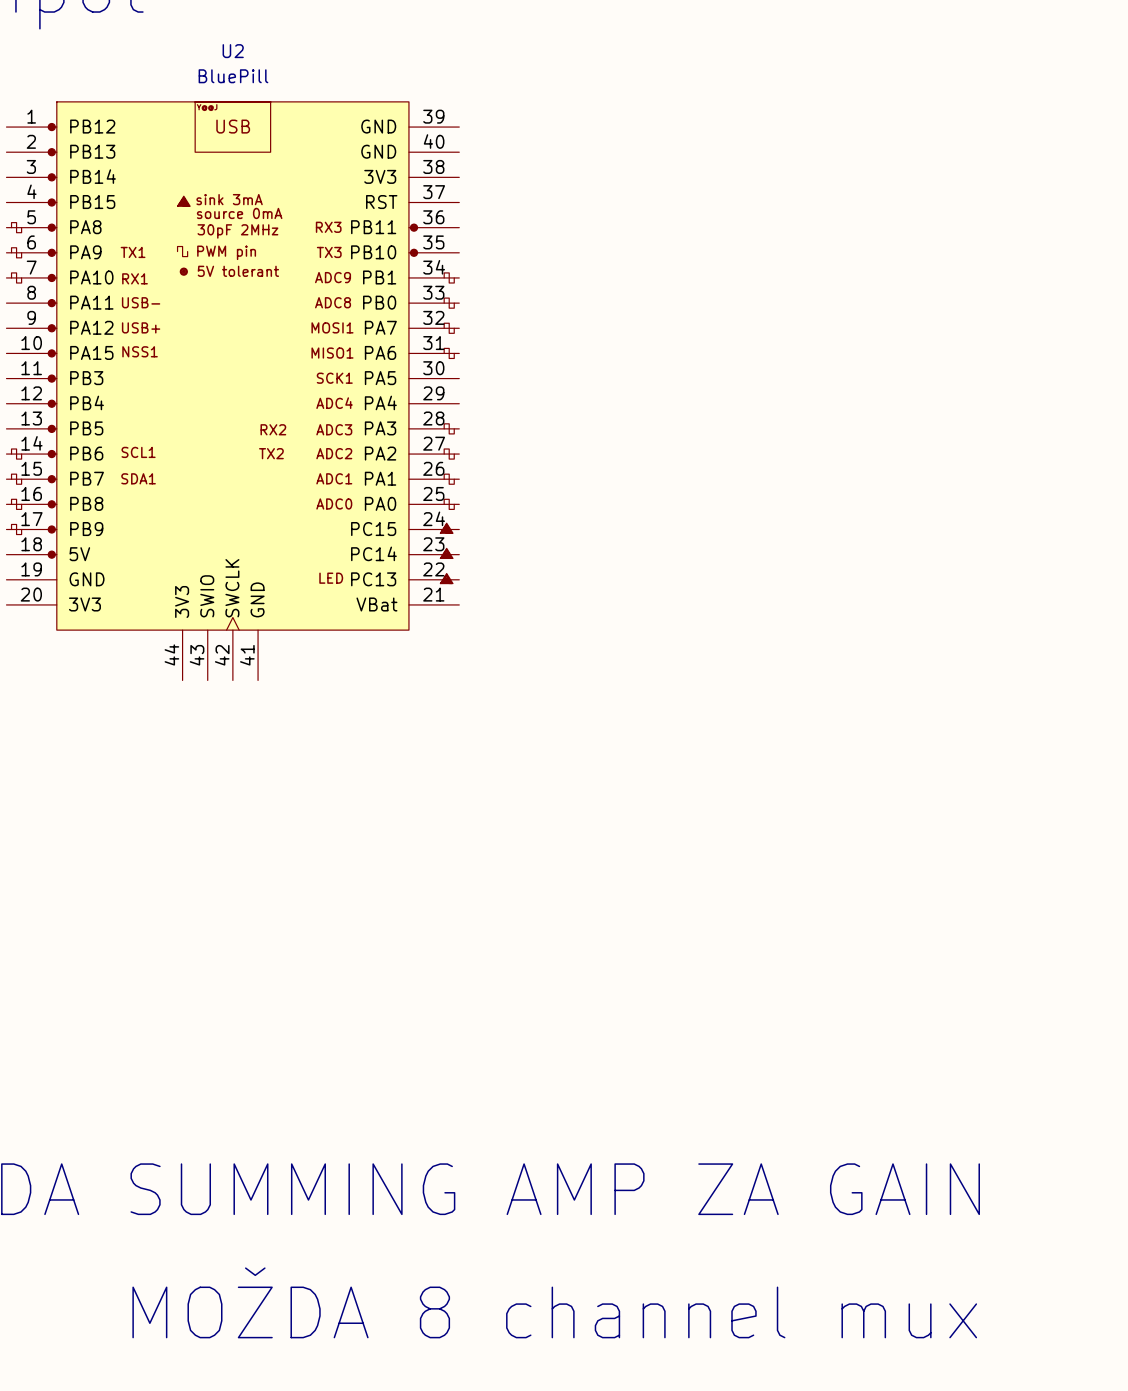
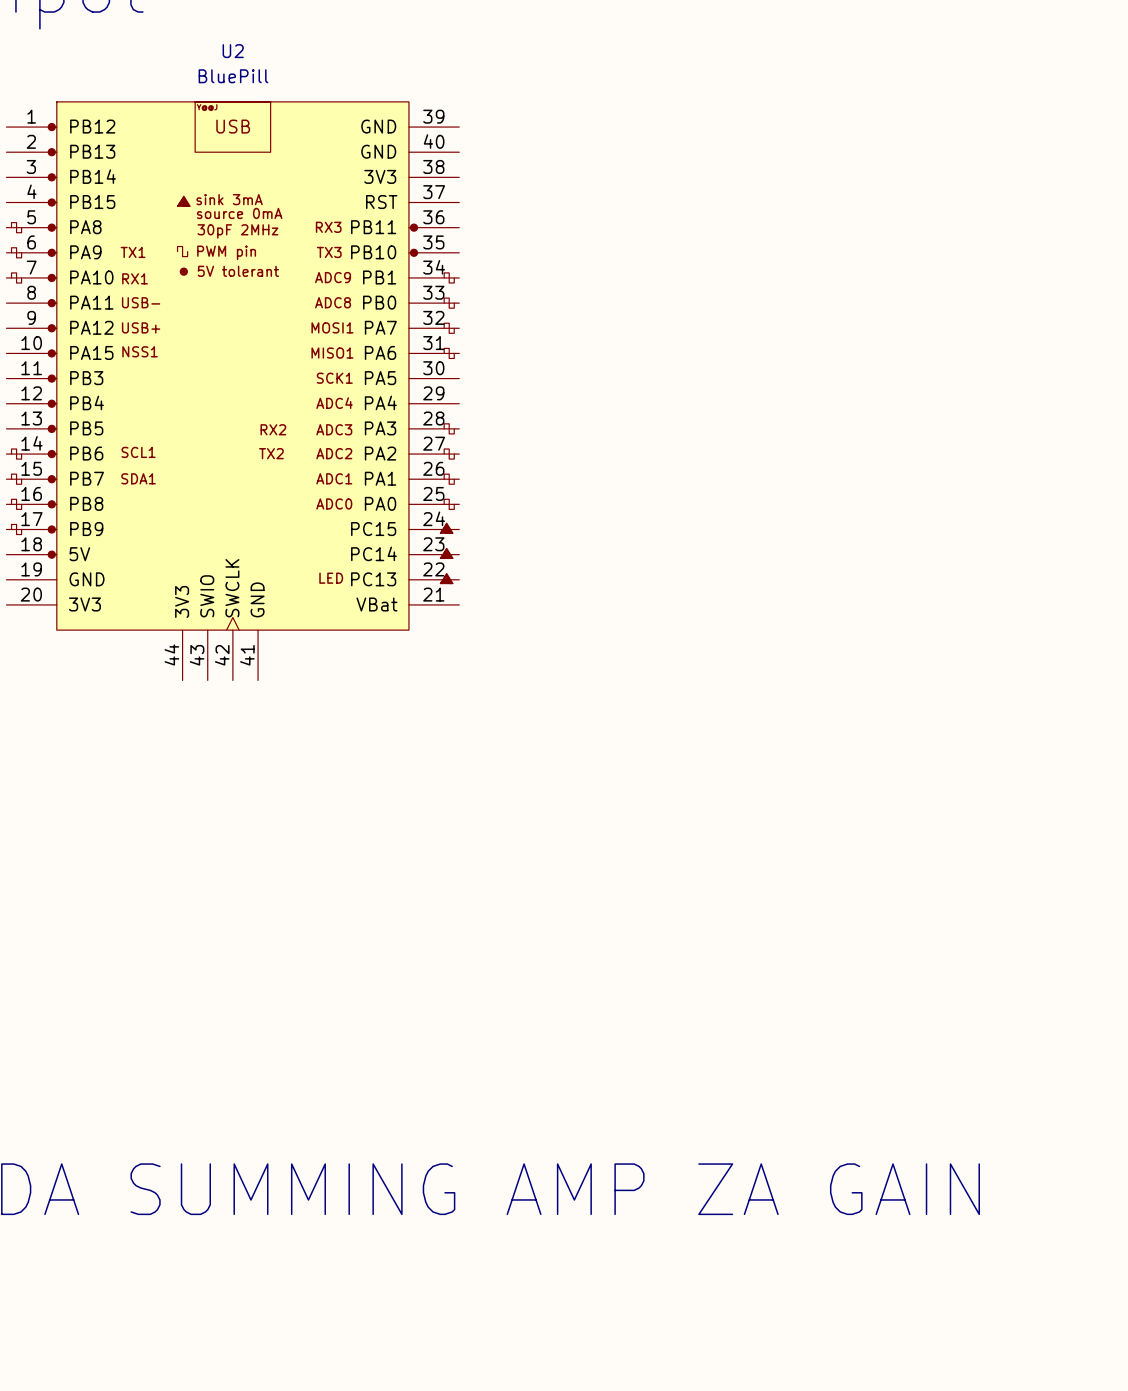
text: MOŽDA 8 channel mux (554, 1302) -> none

